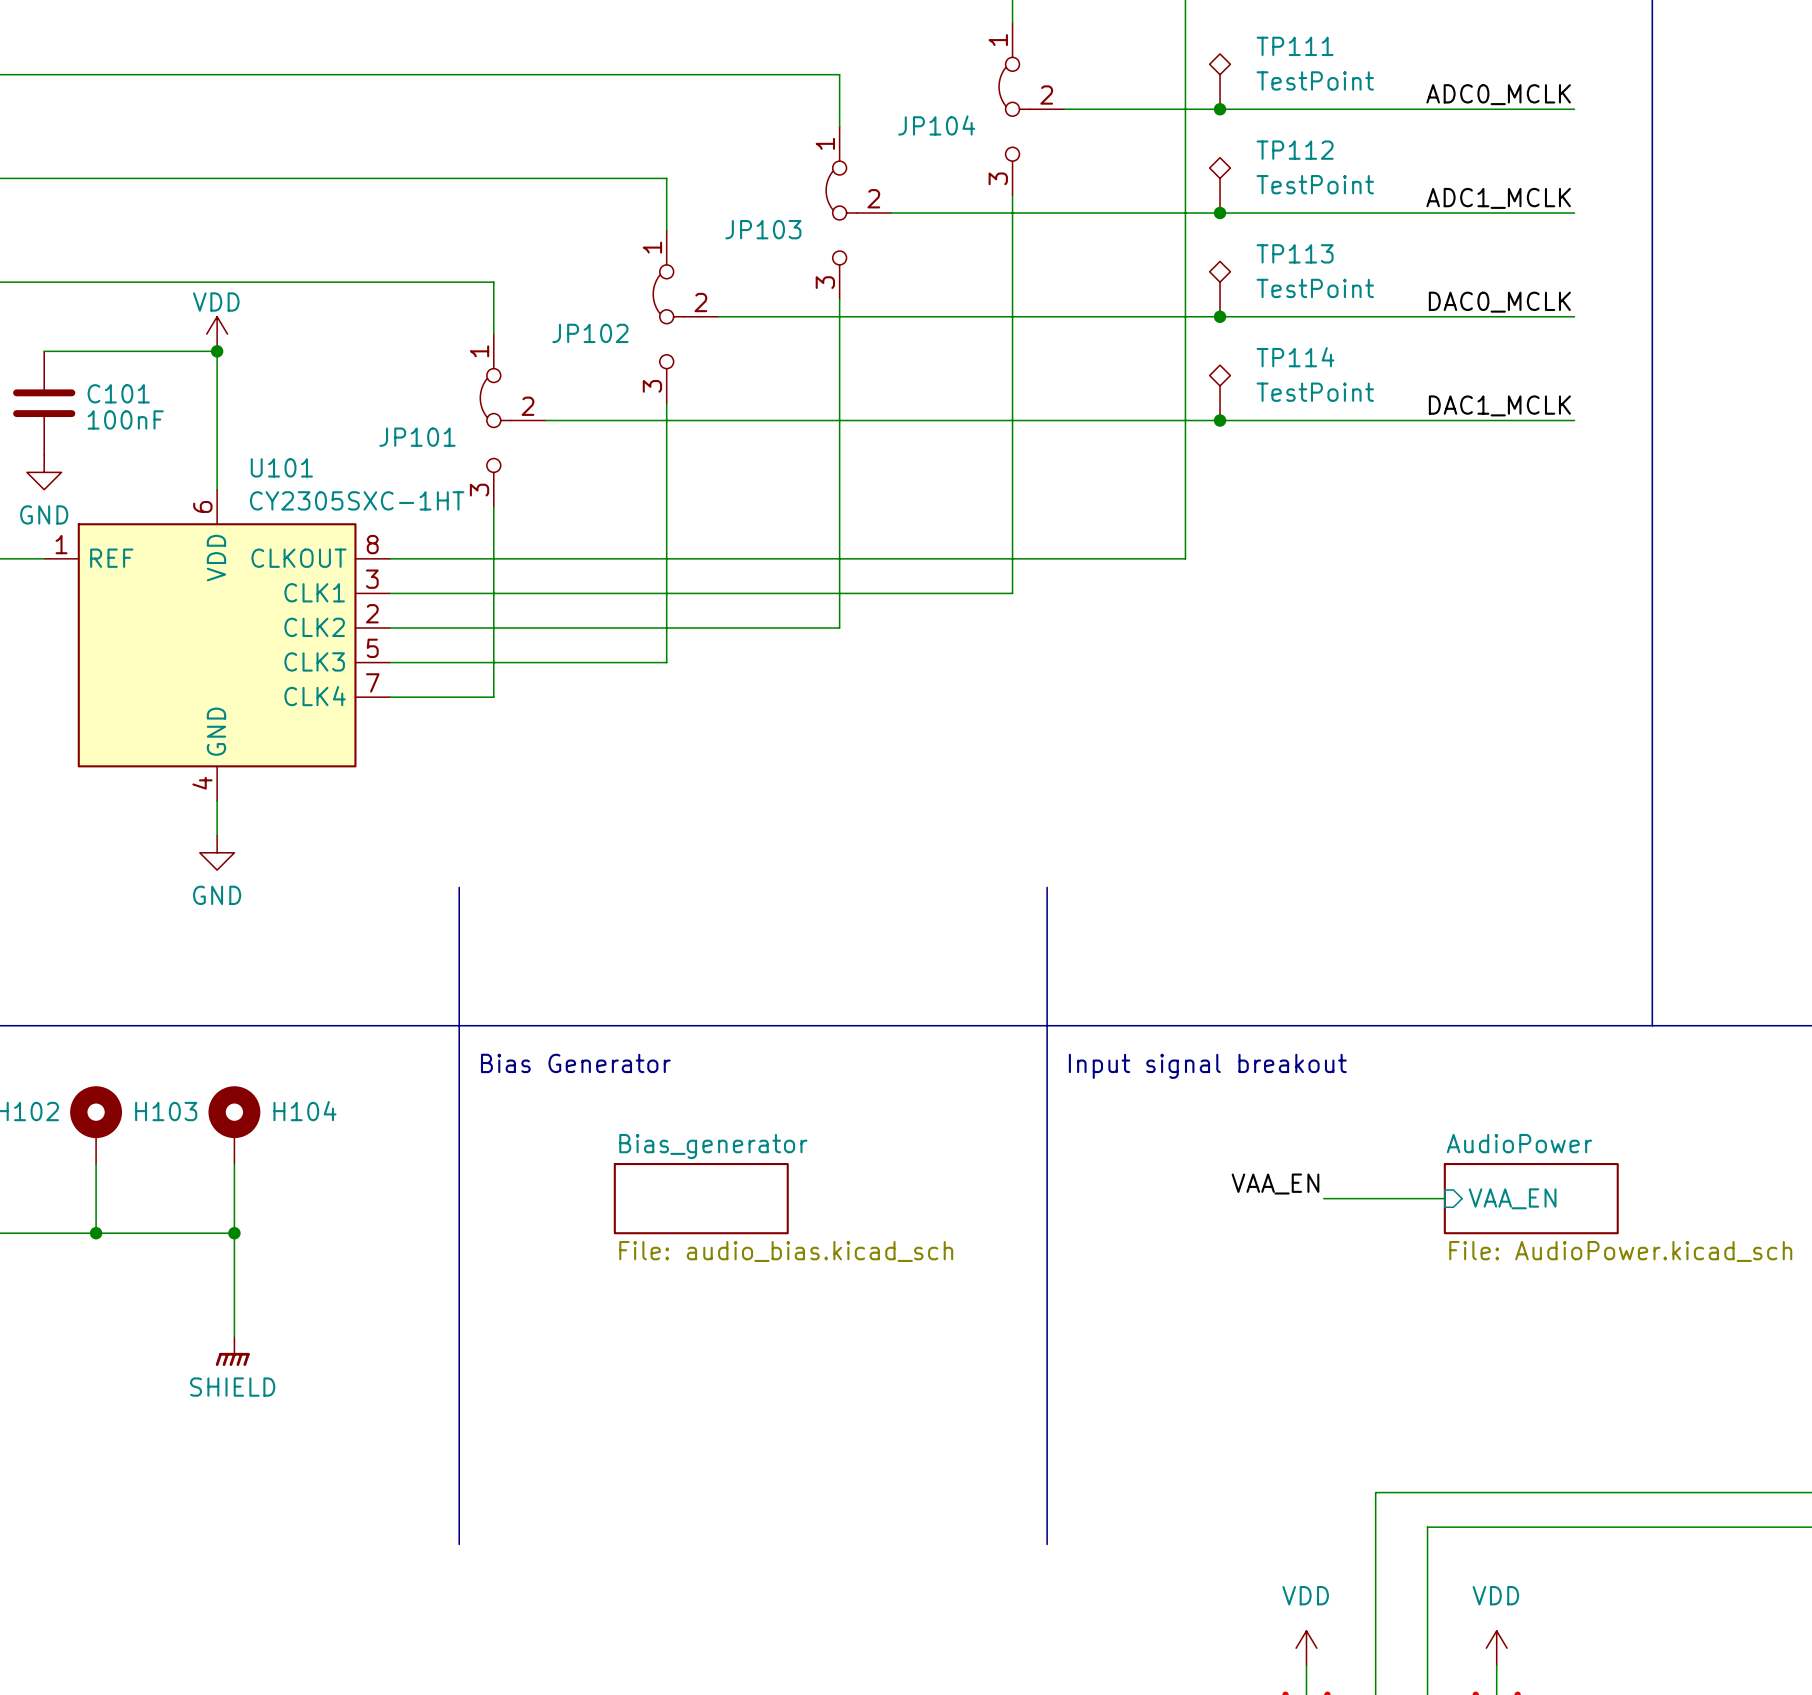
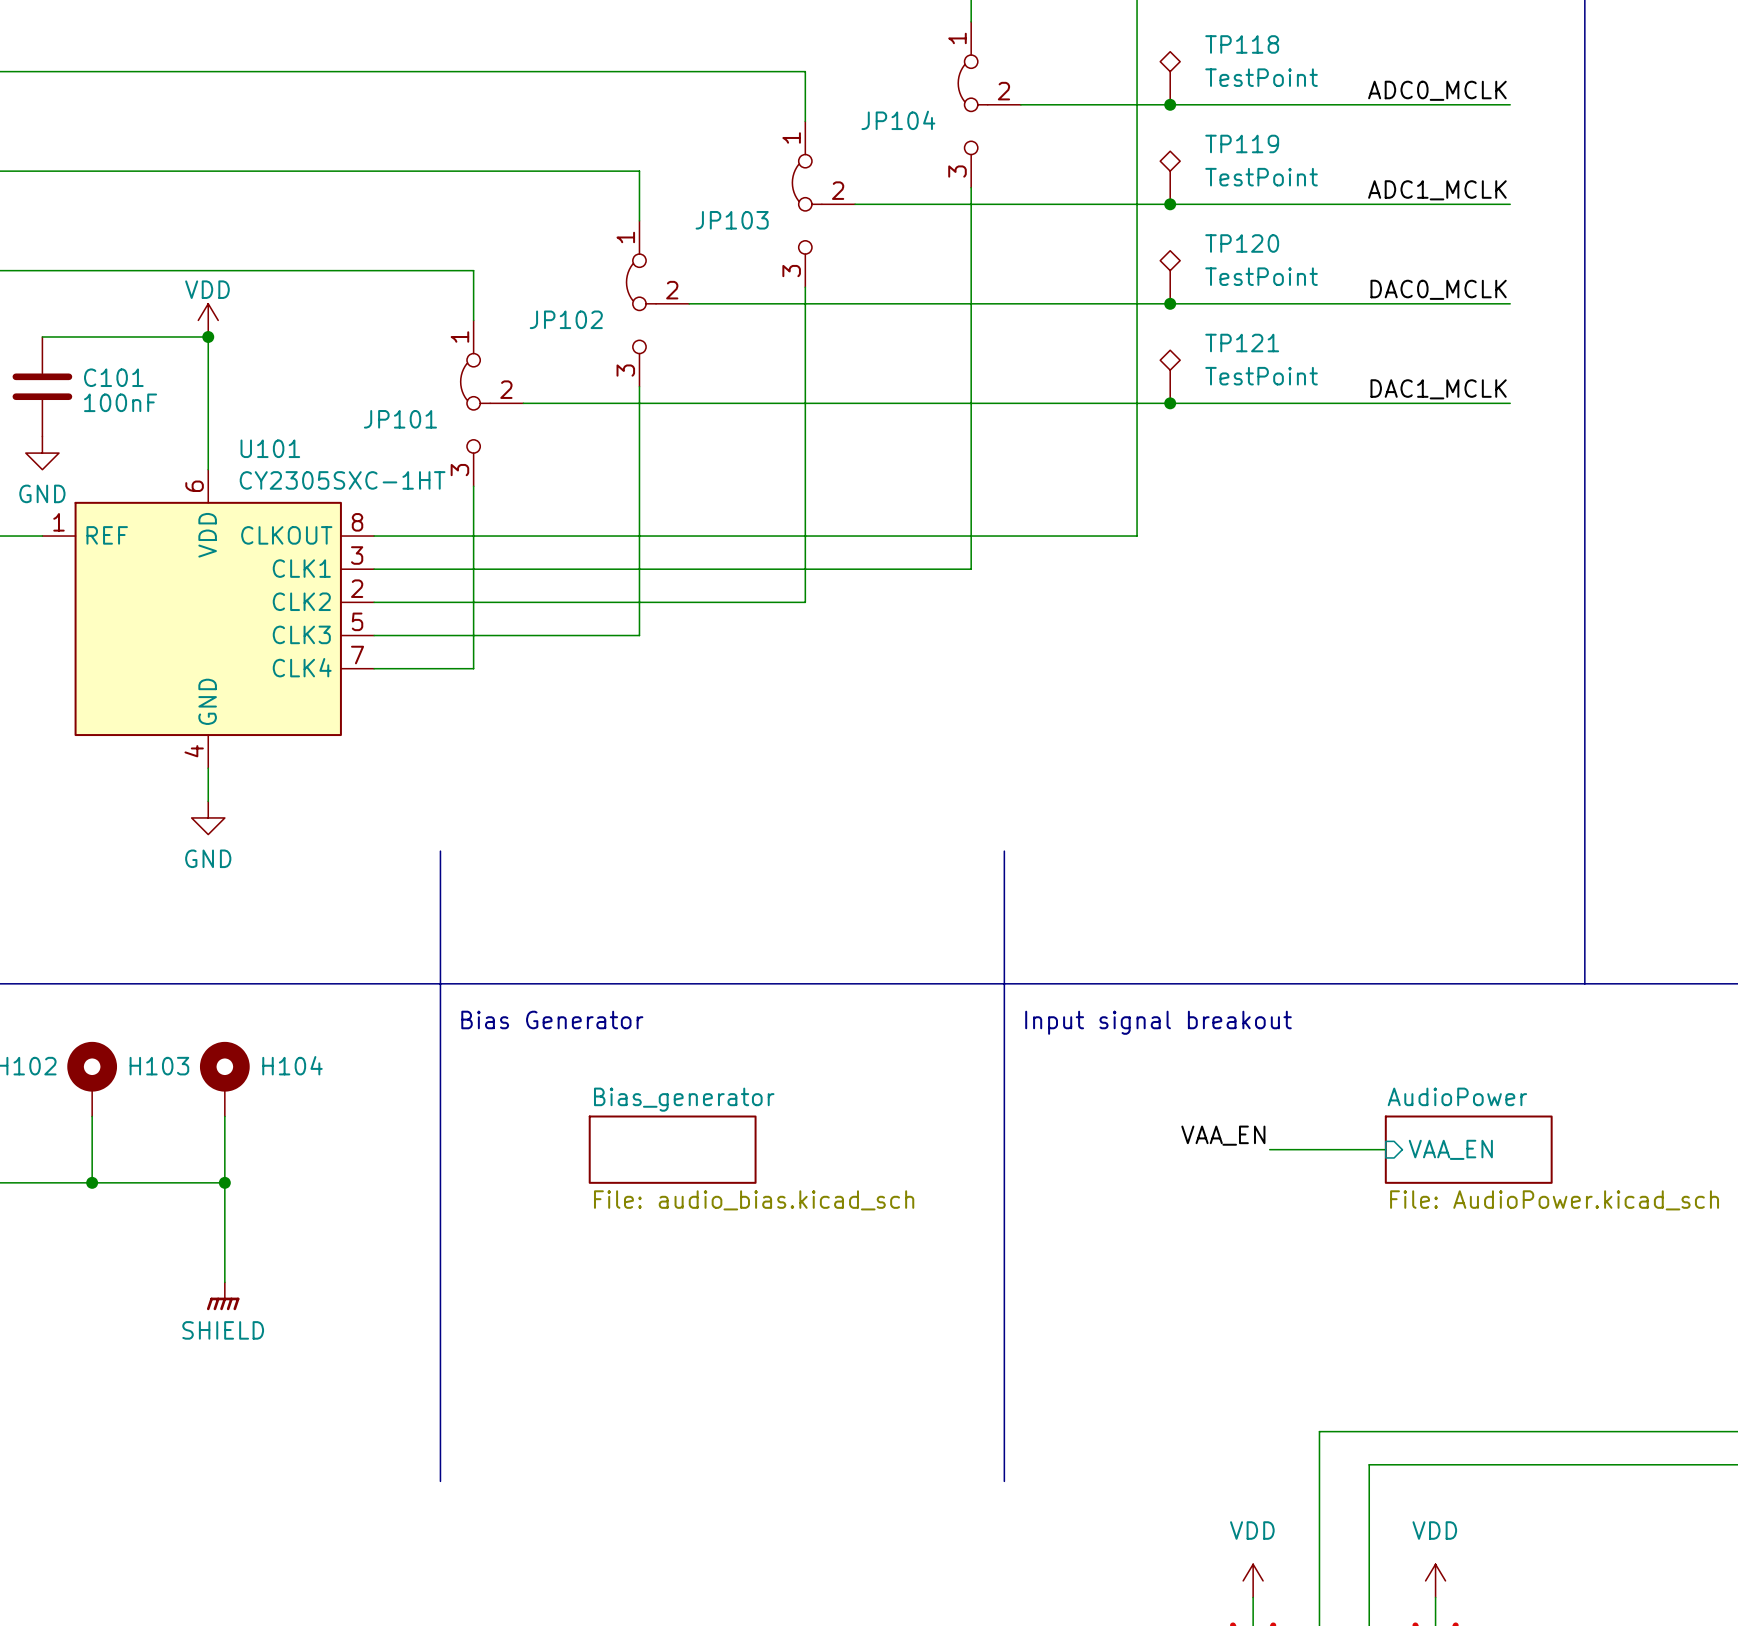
TP111 name: TP111 (1295, 46) -> TP118 (1242, 44)
TP112 name: TP112 (1295, 150) -> TP119 (1242, 143)
TP113 name: TP113 (1295, 253) -> TP120 (1242, 243)
TP114 name: TP114 (1295, 357) -> TP121 (1242, 343)

